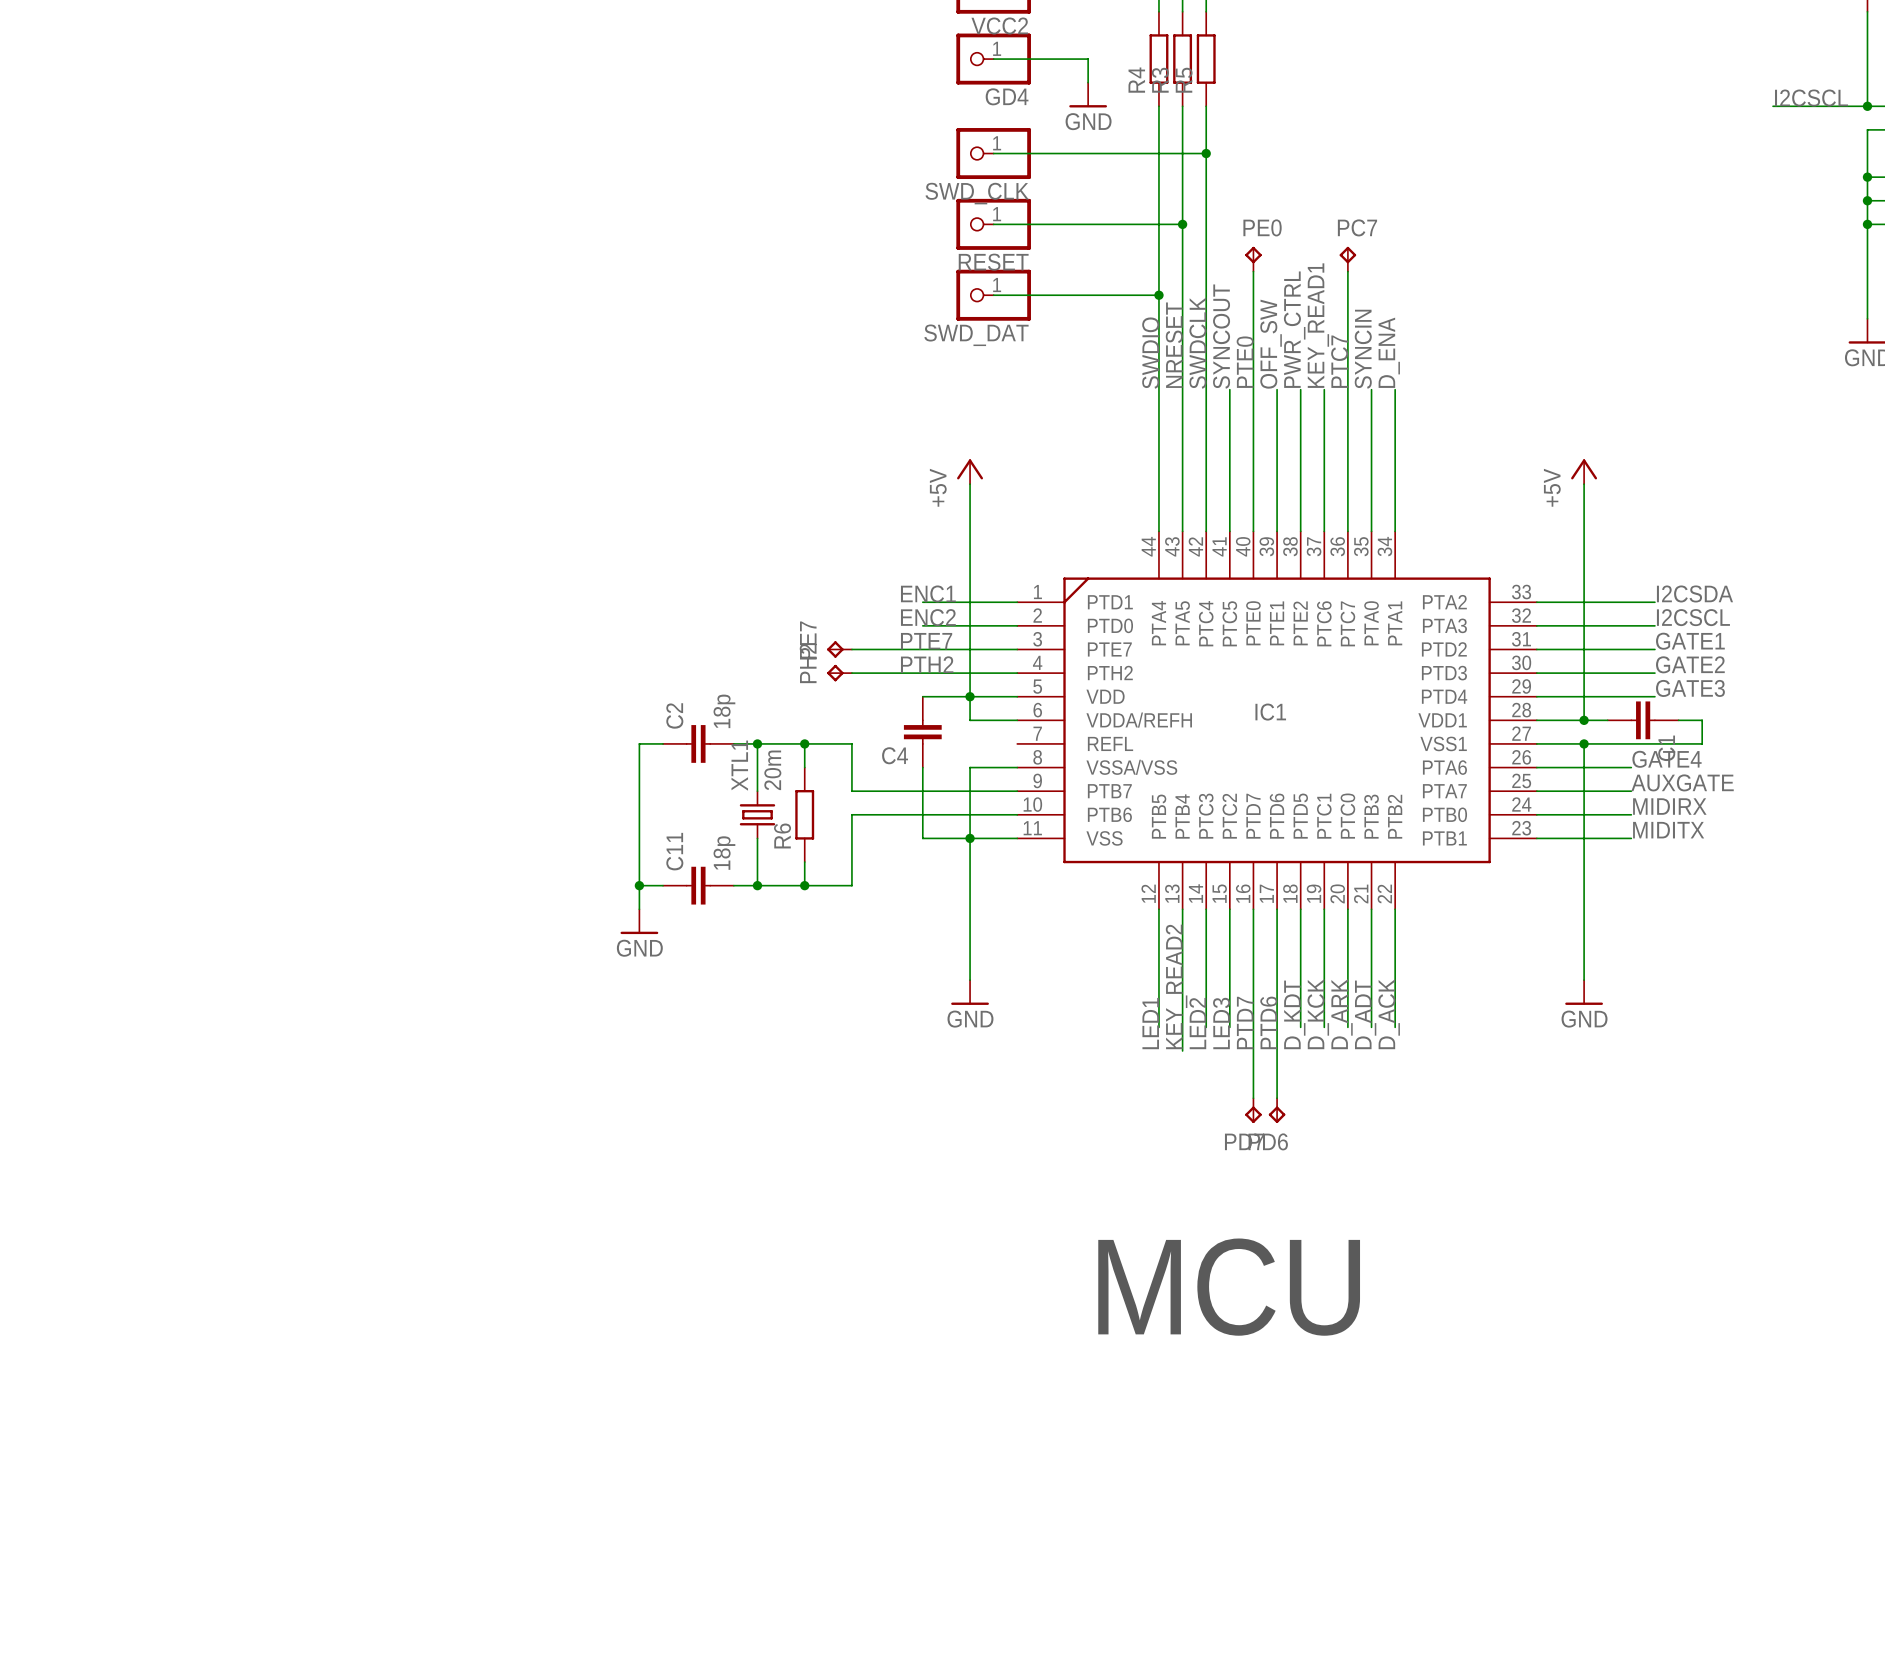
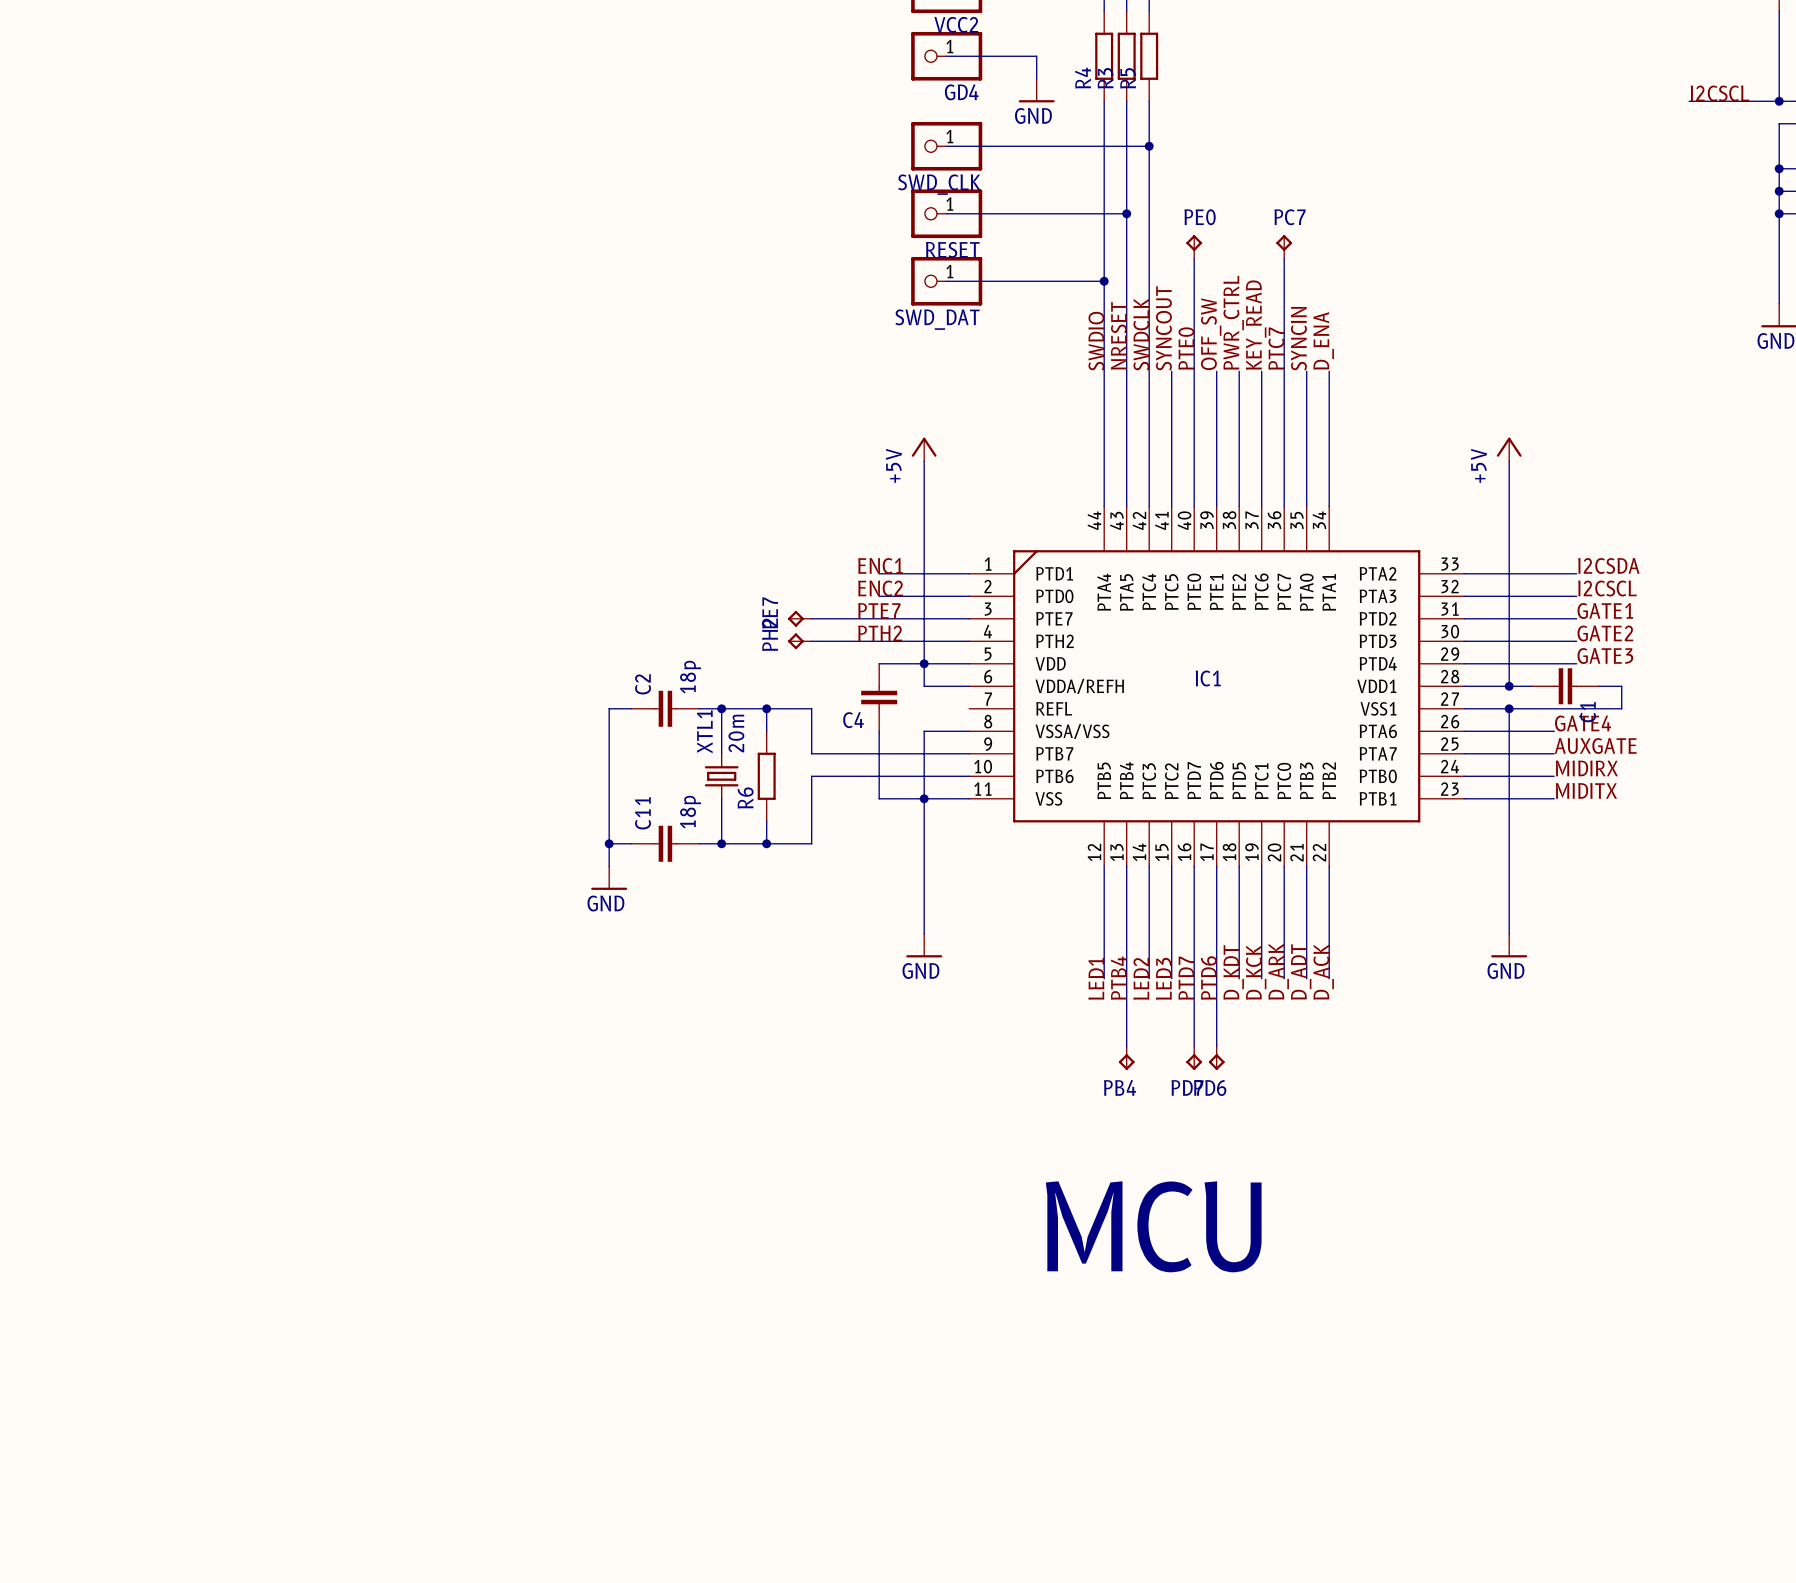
label: KEY_READ1 (1318, 325) -> KEY_READ (1256, 325)
label: KEY_READ2 (1176, 986) -> PTB4 (1118, 978)
wire: none -> (1126, 1001) (1126, 1046)
PB4: none -> (1126, 1058)

